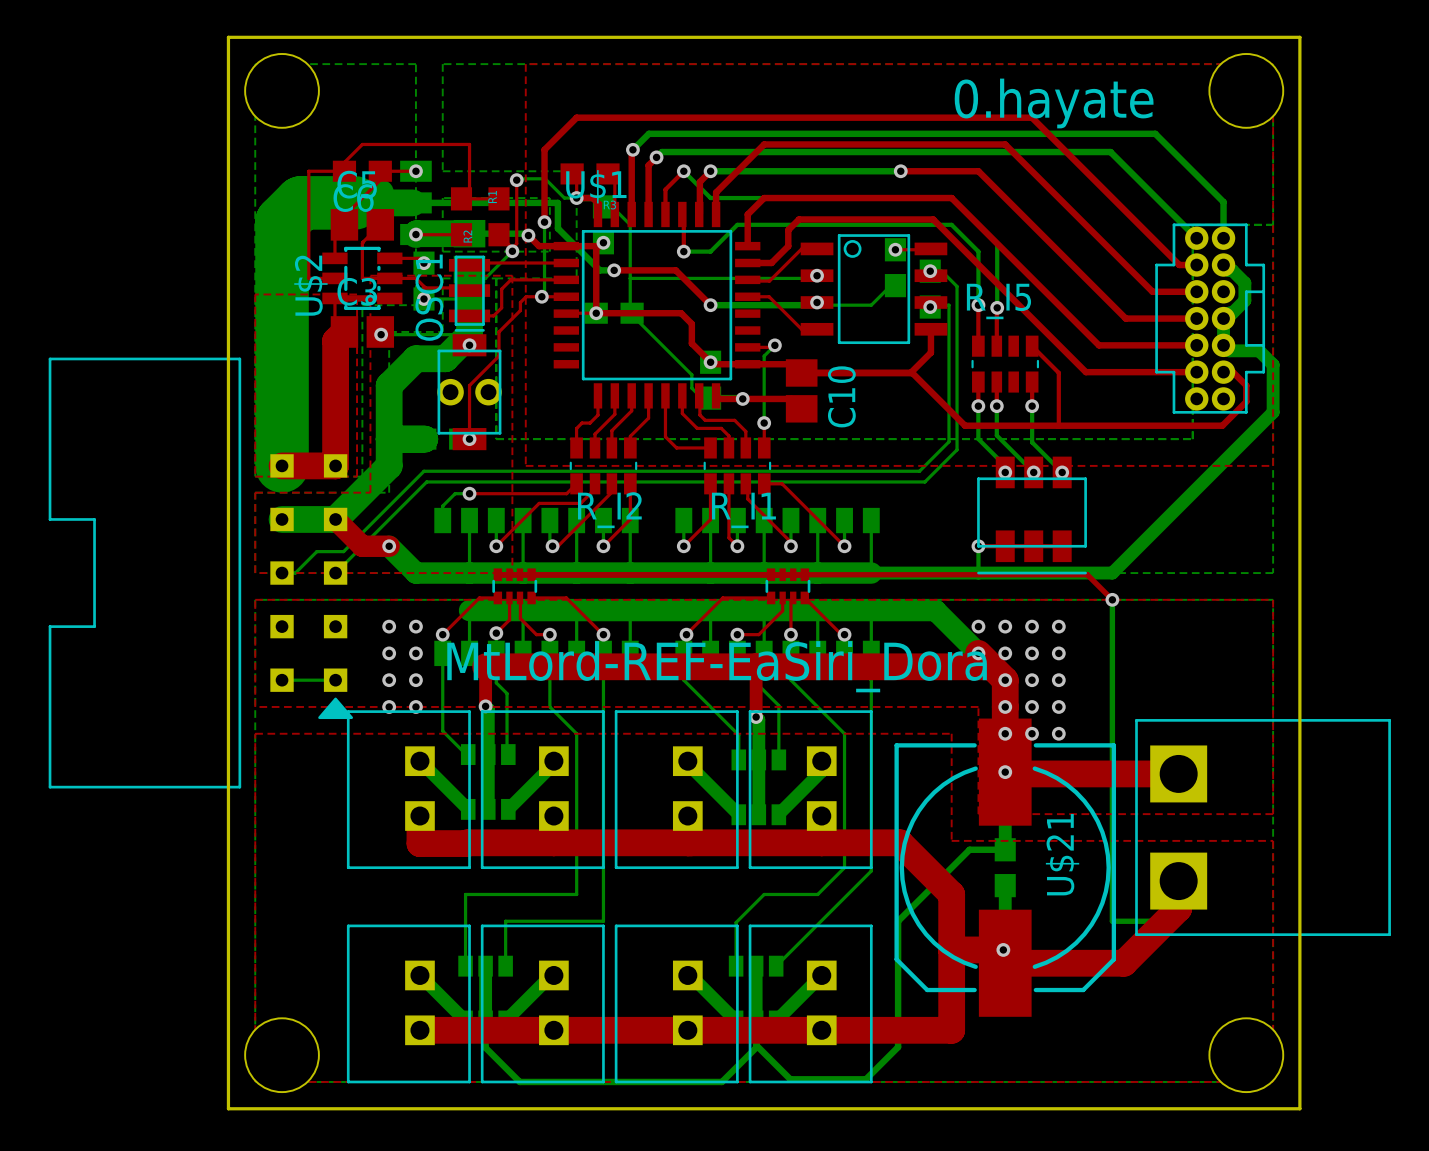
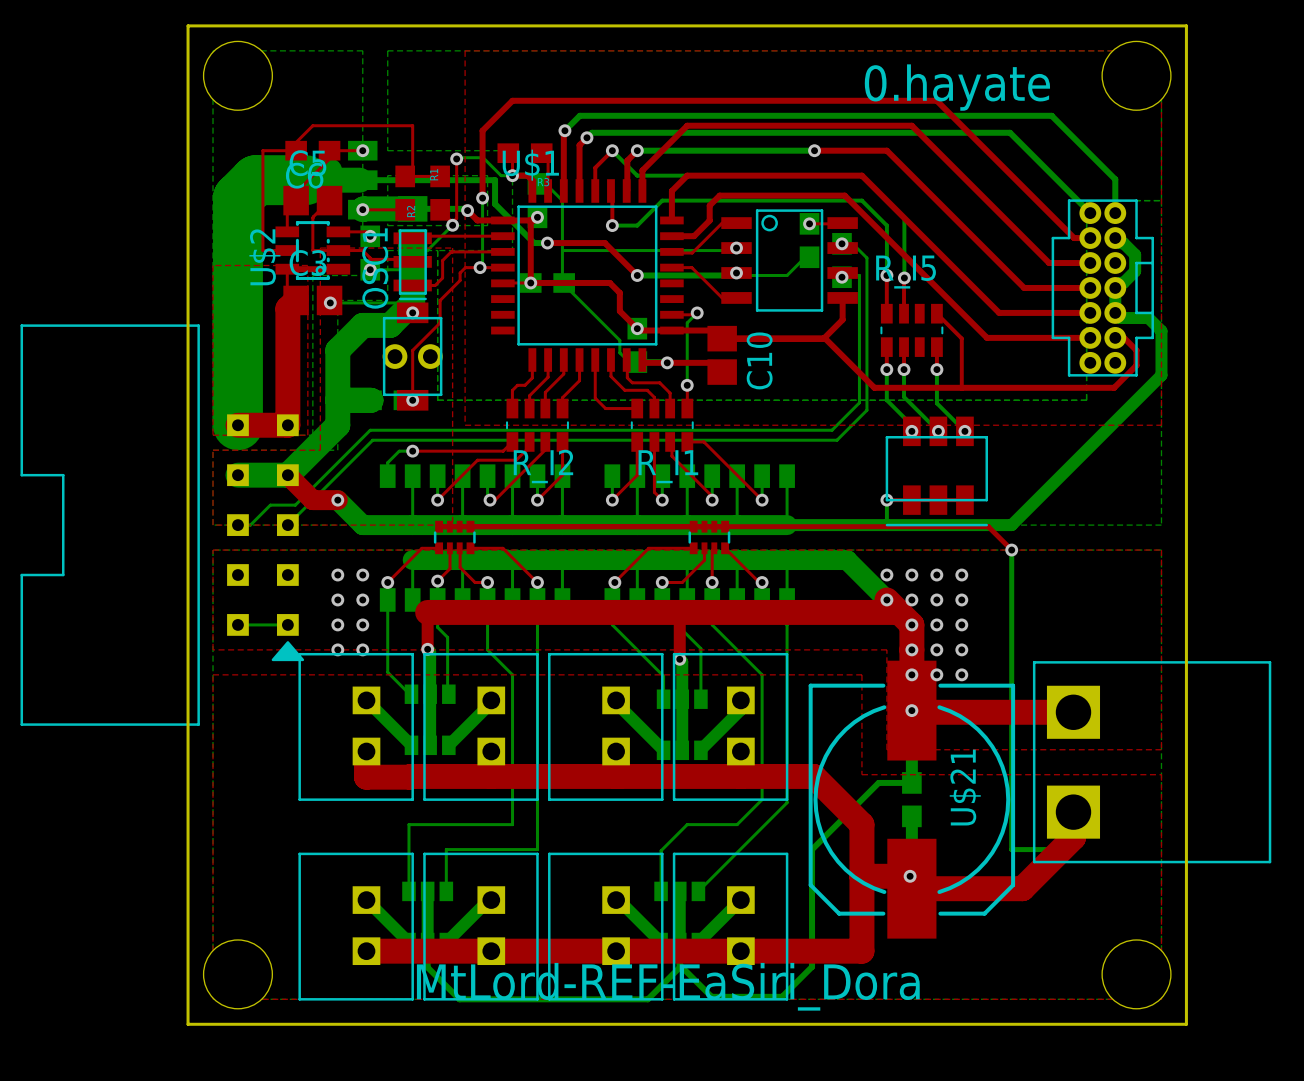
text position: MtLord-REF-EaSiri_Dora (717, 666) -> MtLord-REF-EaSiri_Dora (668, 986)

